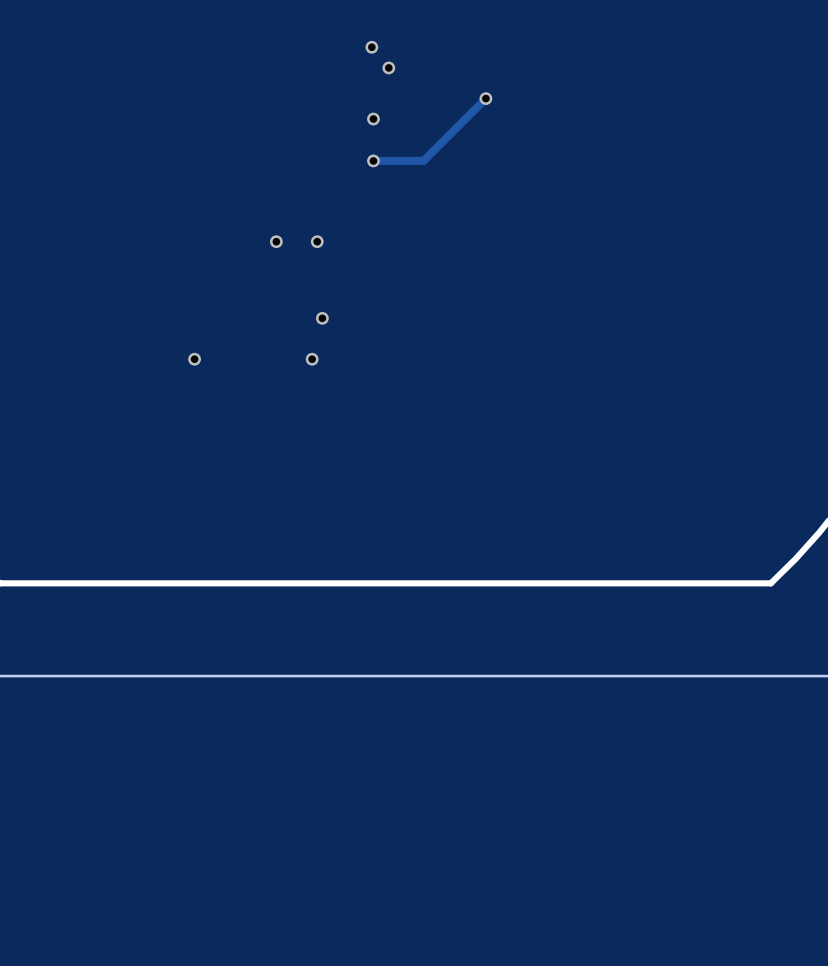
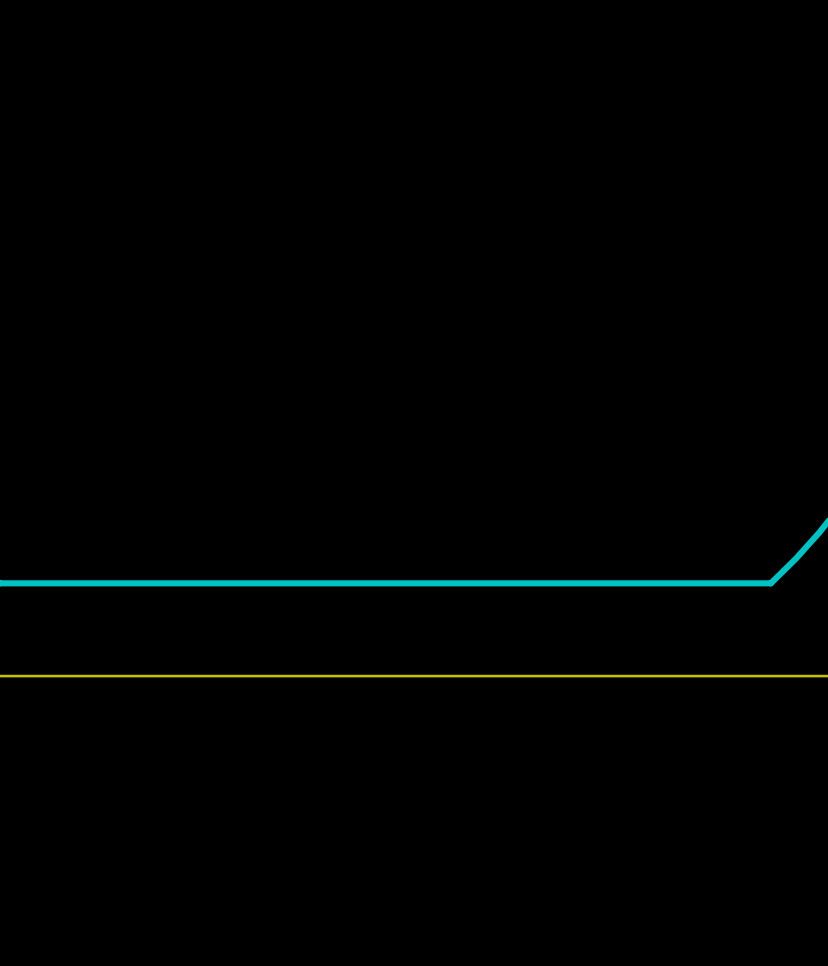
via: (371, 47) -> none
via: (388, 67) -> none
track: (485, 98) (423, 160) (373, 160) -> none
via: (485, 98) -> none
via: (373, 119) -> none
via: (373, 160) -> none
via: (276, 241) -> none
via: (317, 241) -> none
via: (322, 318) -> none
via: (194, 359) -> none
via: (312, 359) -> none

